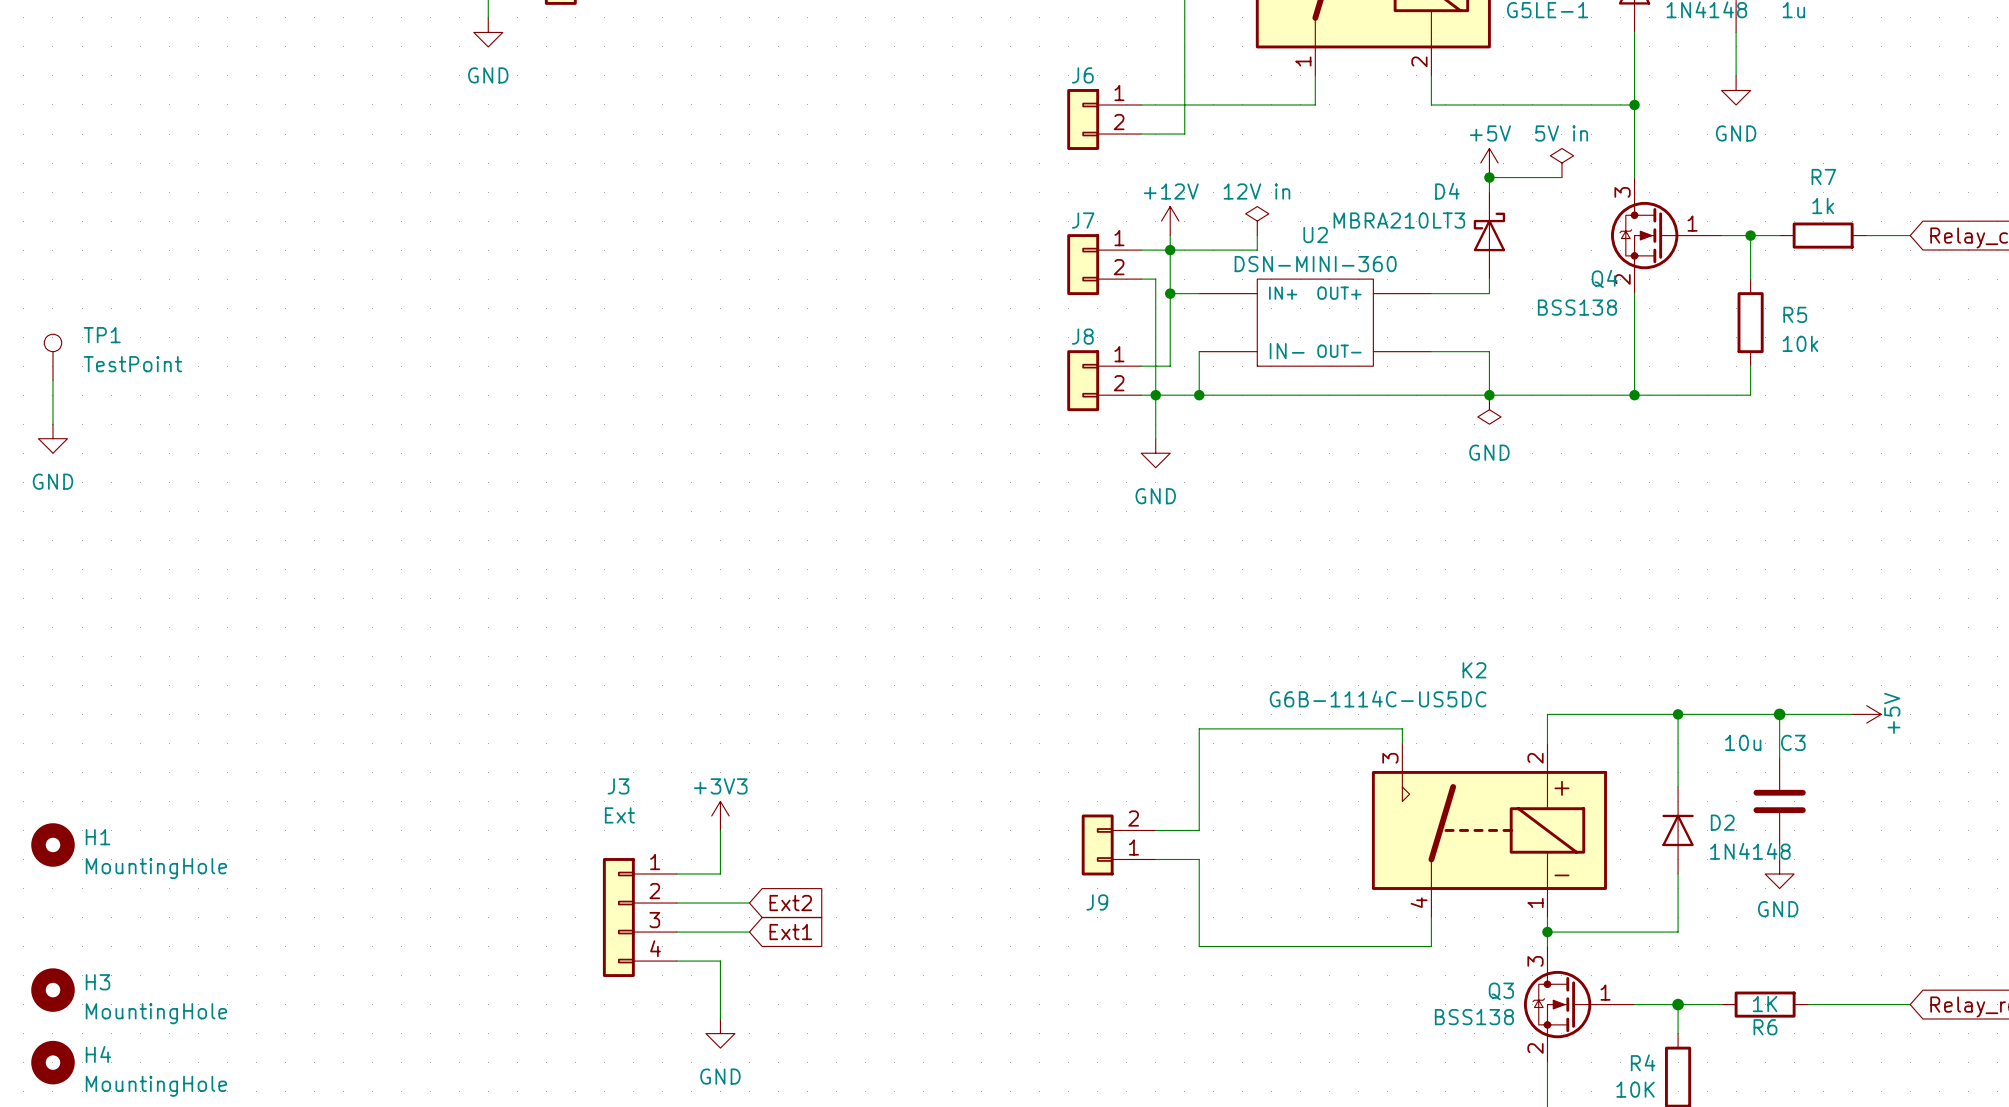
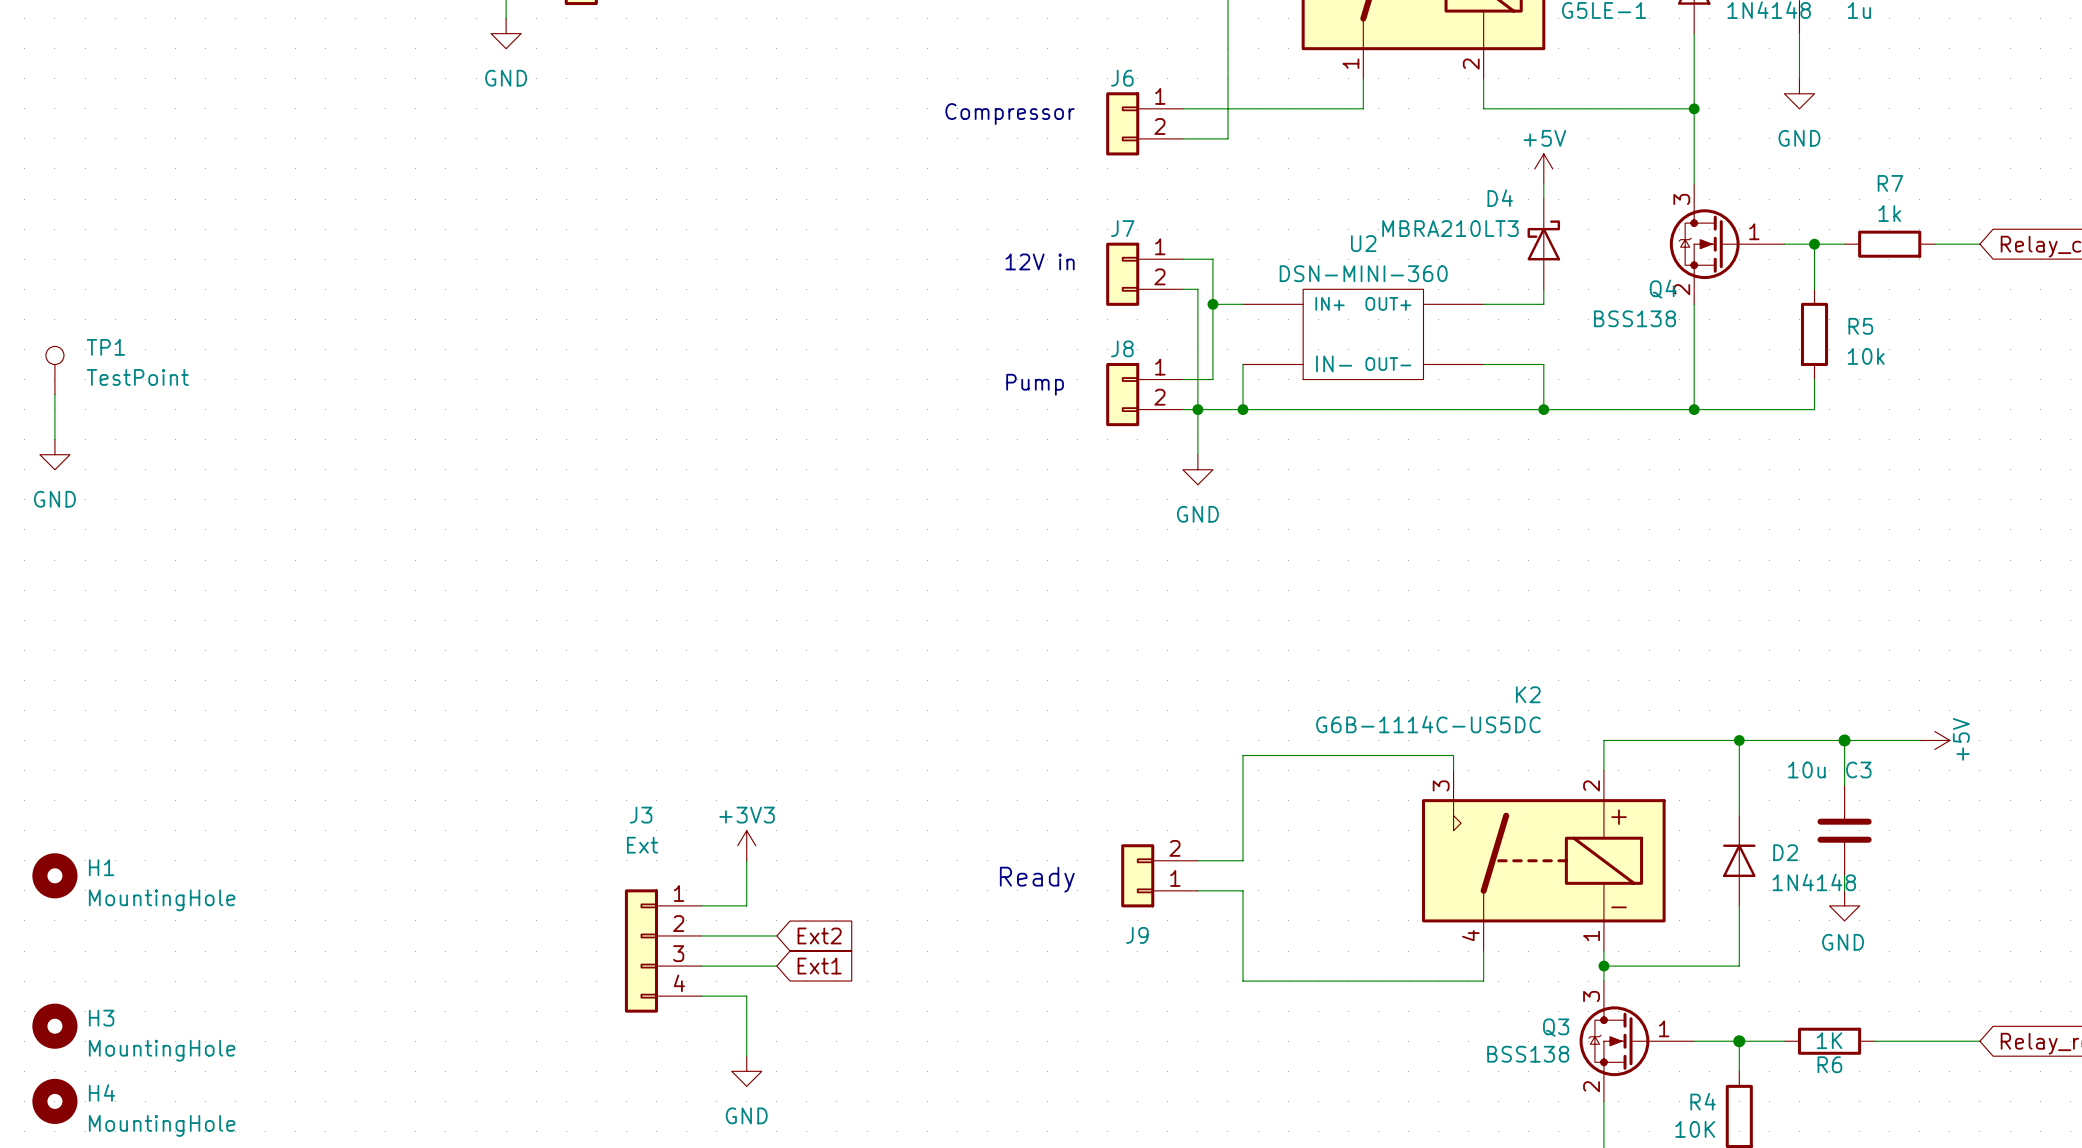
text: none -> Compressor (1010, 114)
power symbol: 5V in (1561, 163) -> none
wire: (1489, 177) (1561, 177) -> none
junction: (1489, 177) -> none
power symbol: +12V (1170, 221) -> none
power symbol: 12V in (1257, 221) -> none
wire: (1170, 235) (1170, 250) (1257, 250) (1257, 235) -> none
junction: (1170, 250) -> none
text: none -> 12V in (1040, 261)
text: none -> Pump (1035, 384)
power symbol: GND (1489, 409) -> none
text: none -> Ready (1037, 879)

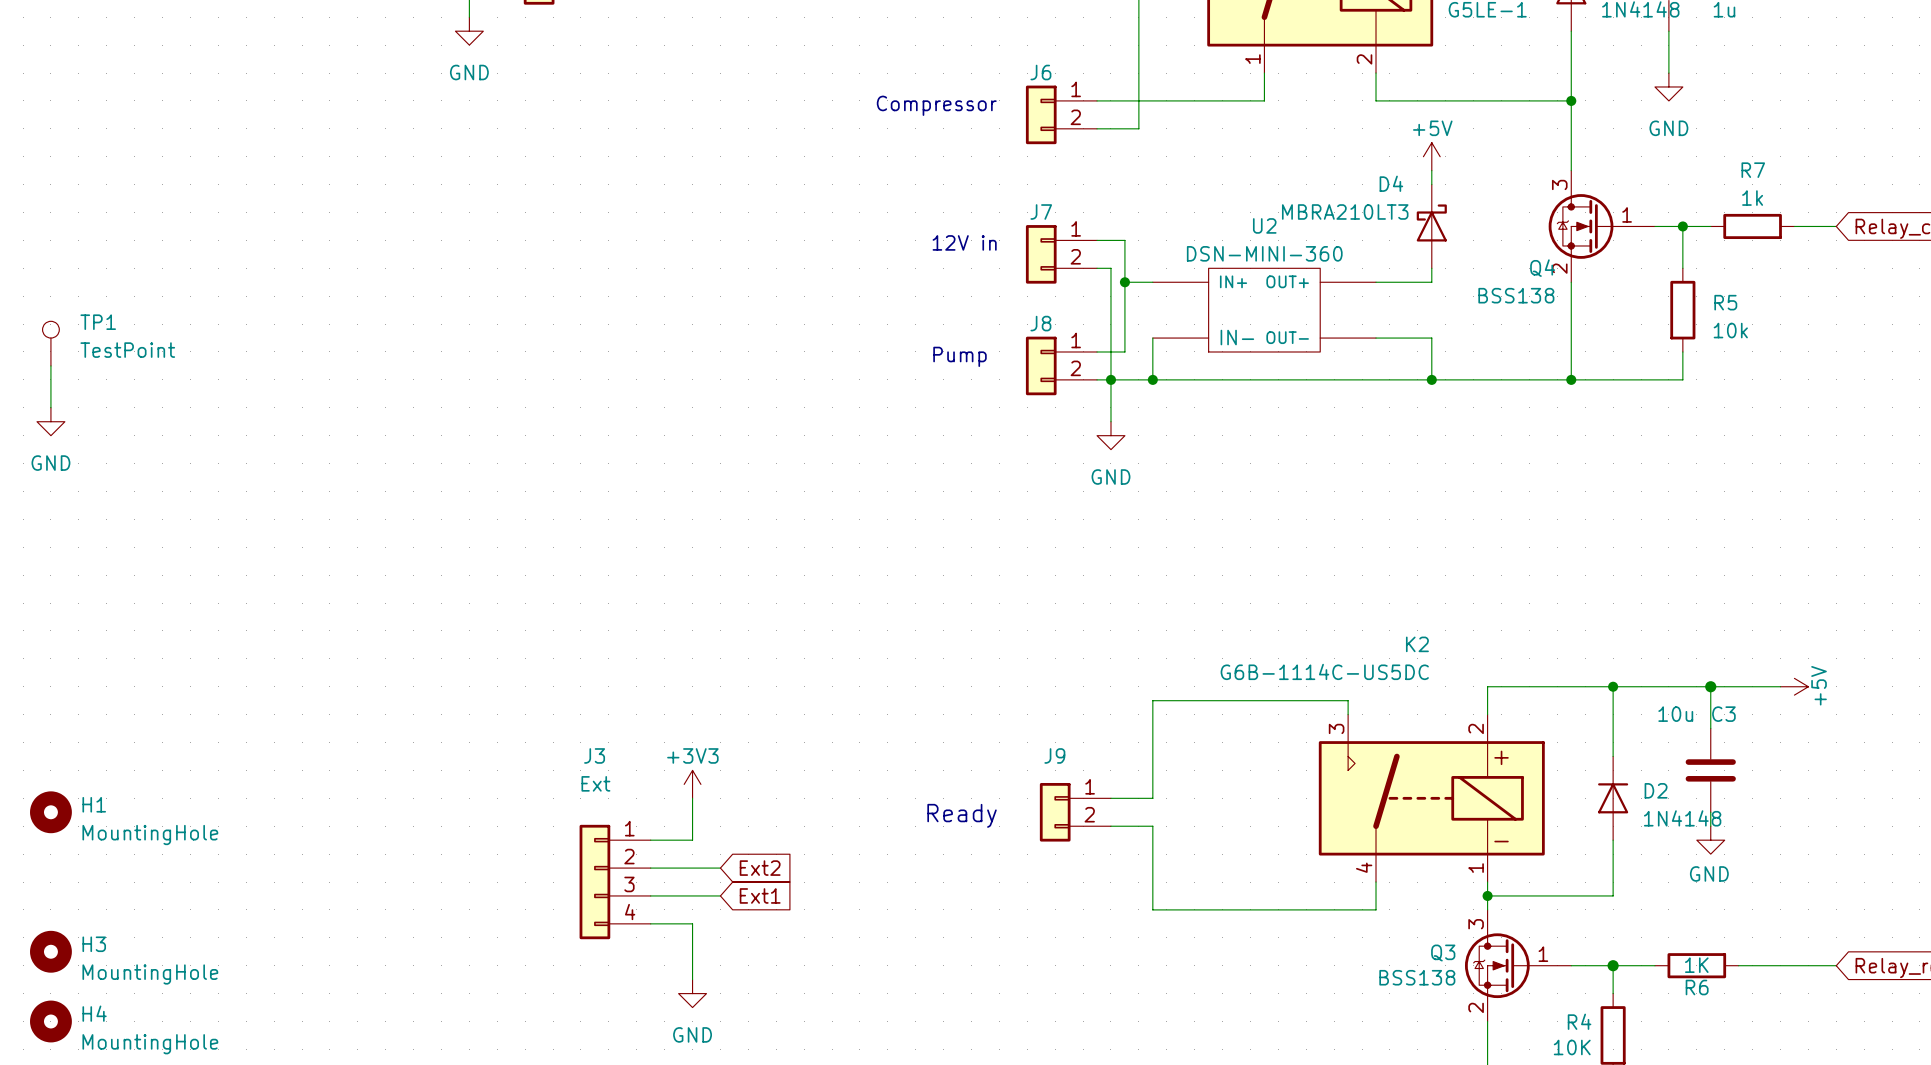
J9 flip: as is (1137, 875) -> up-down (1055, 812)

